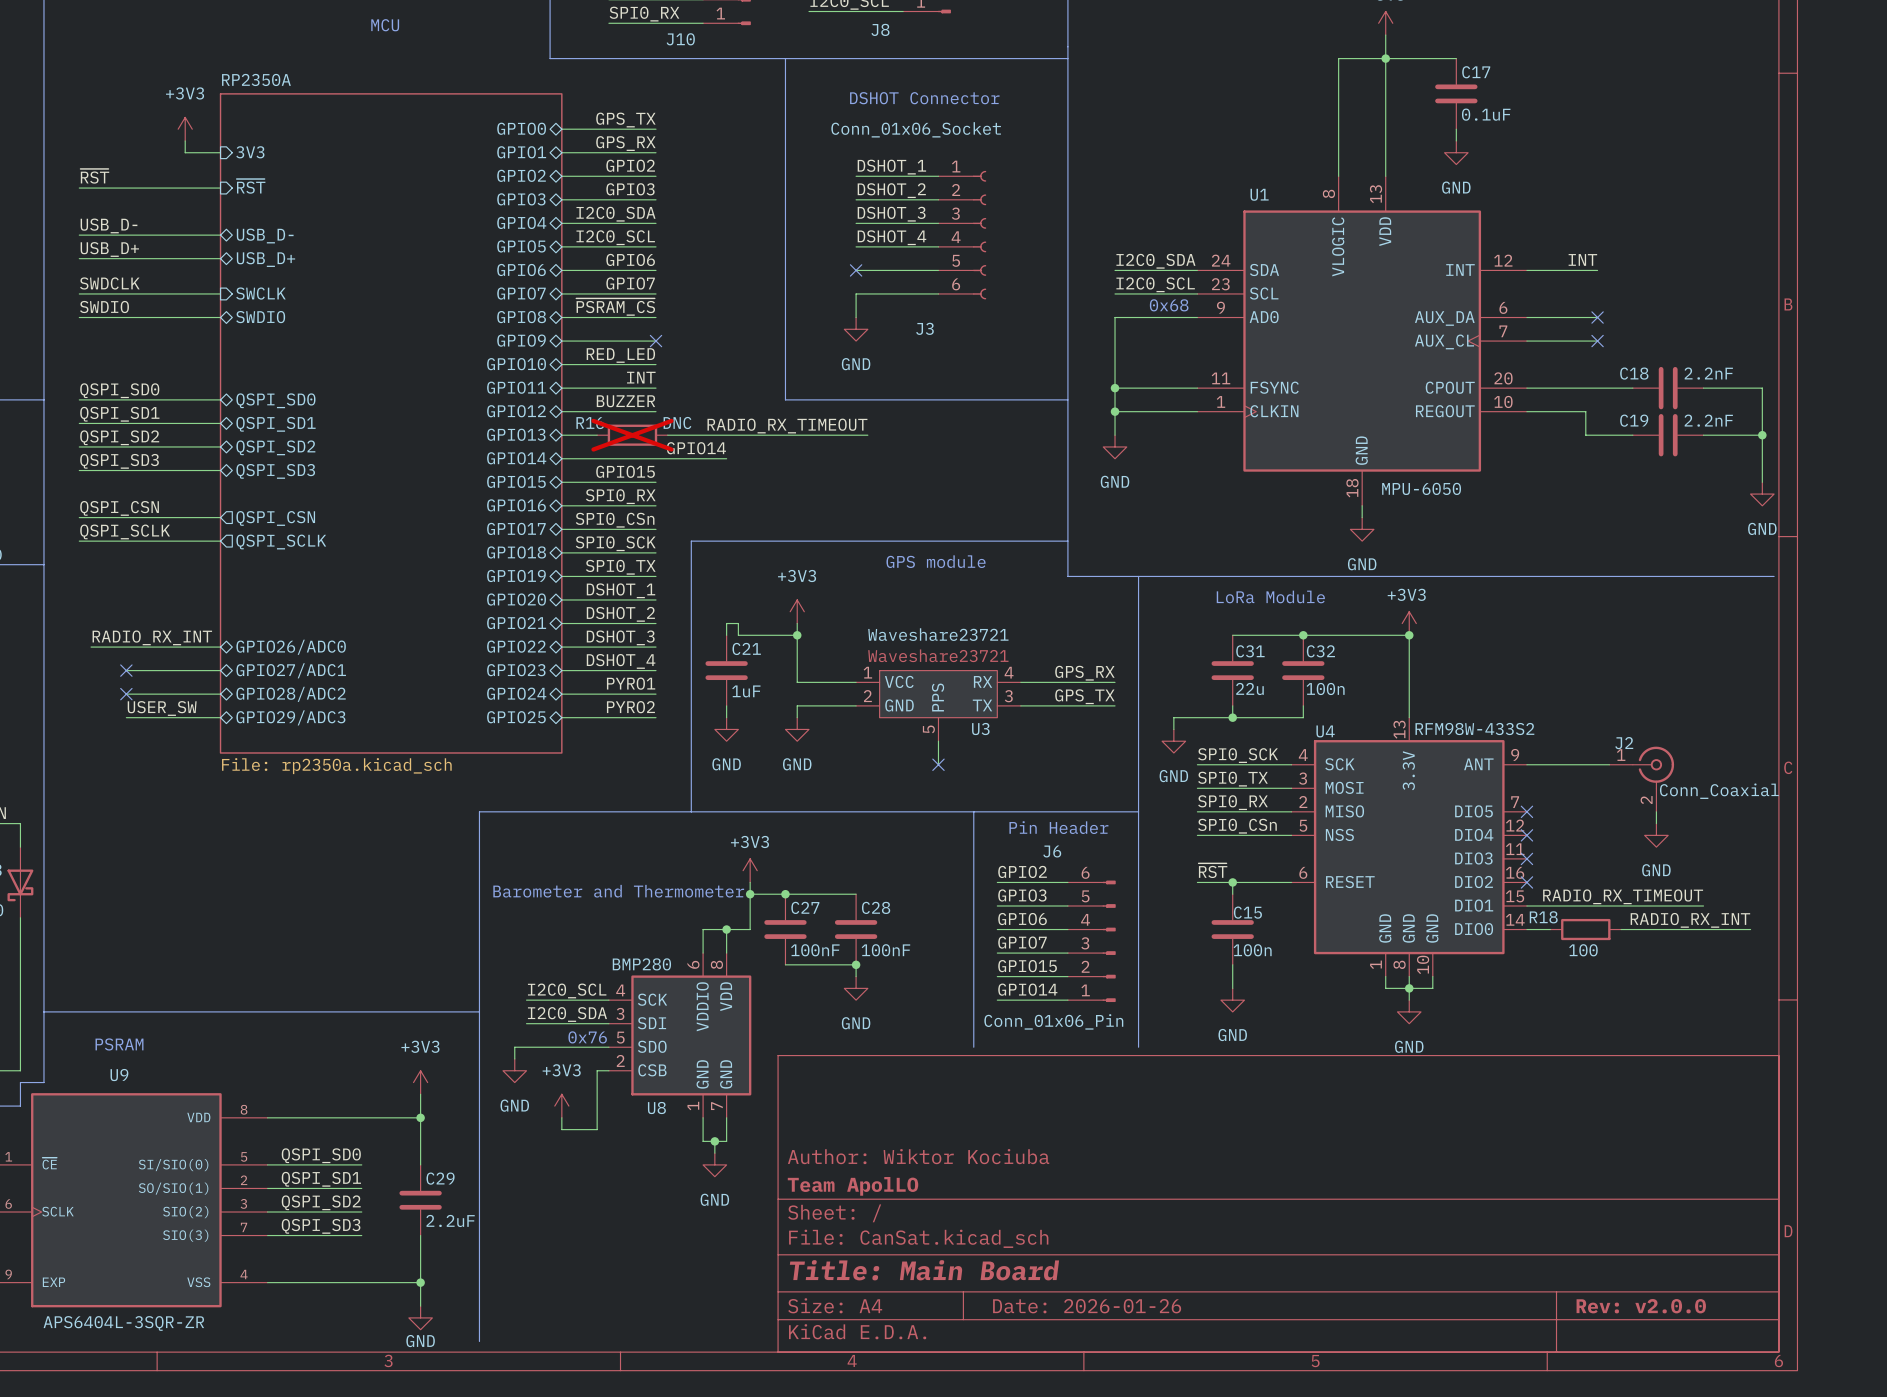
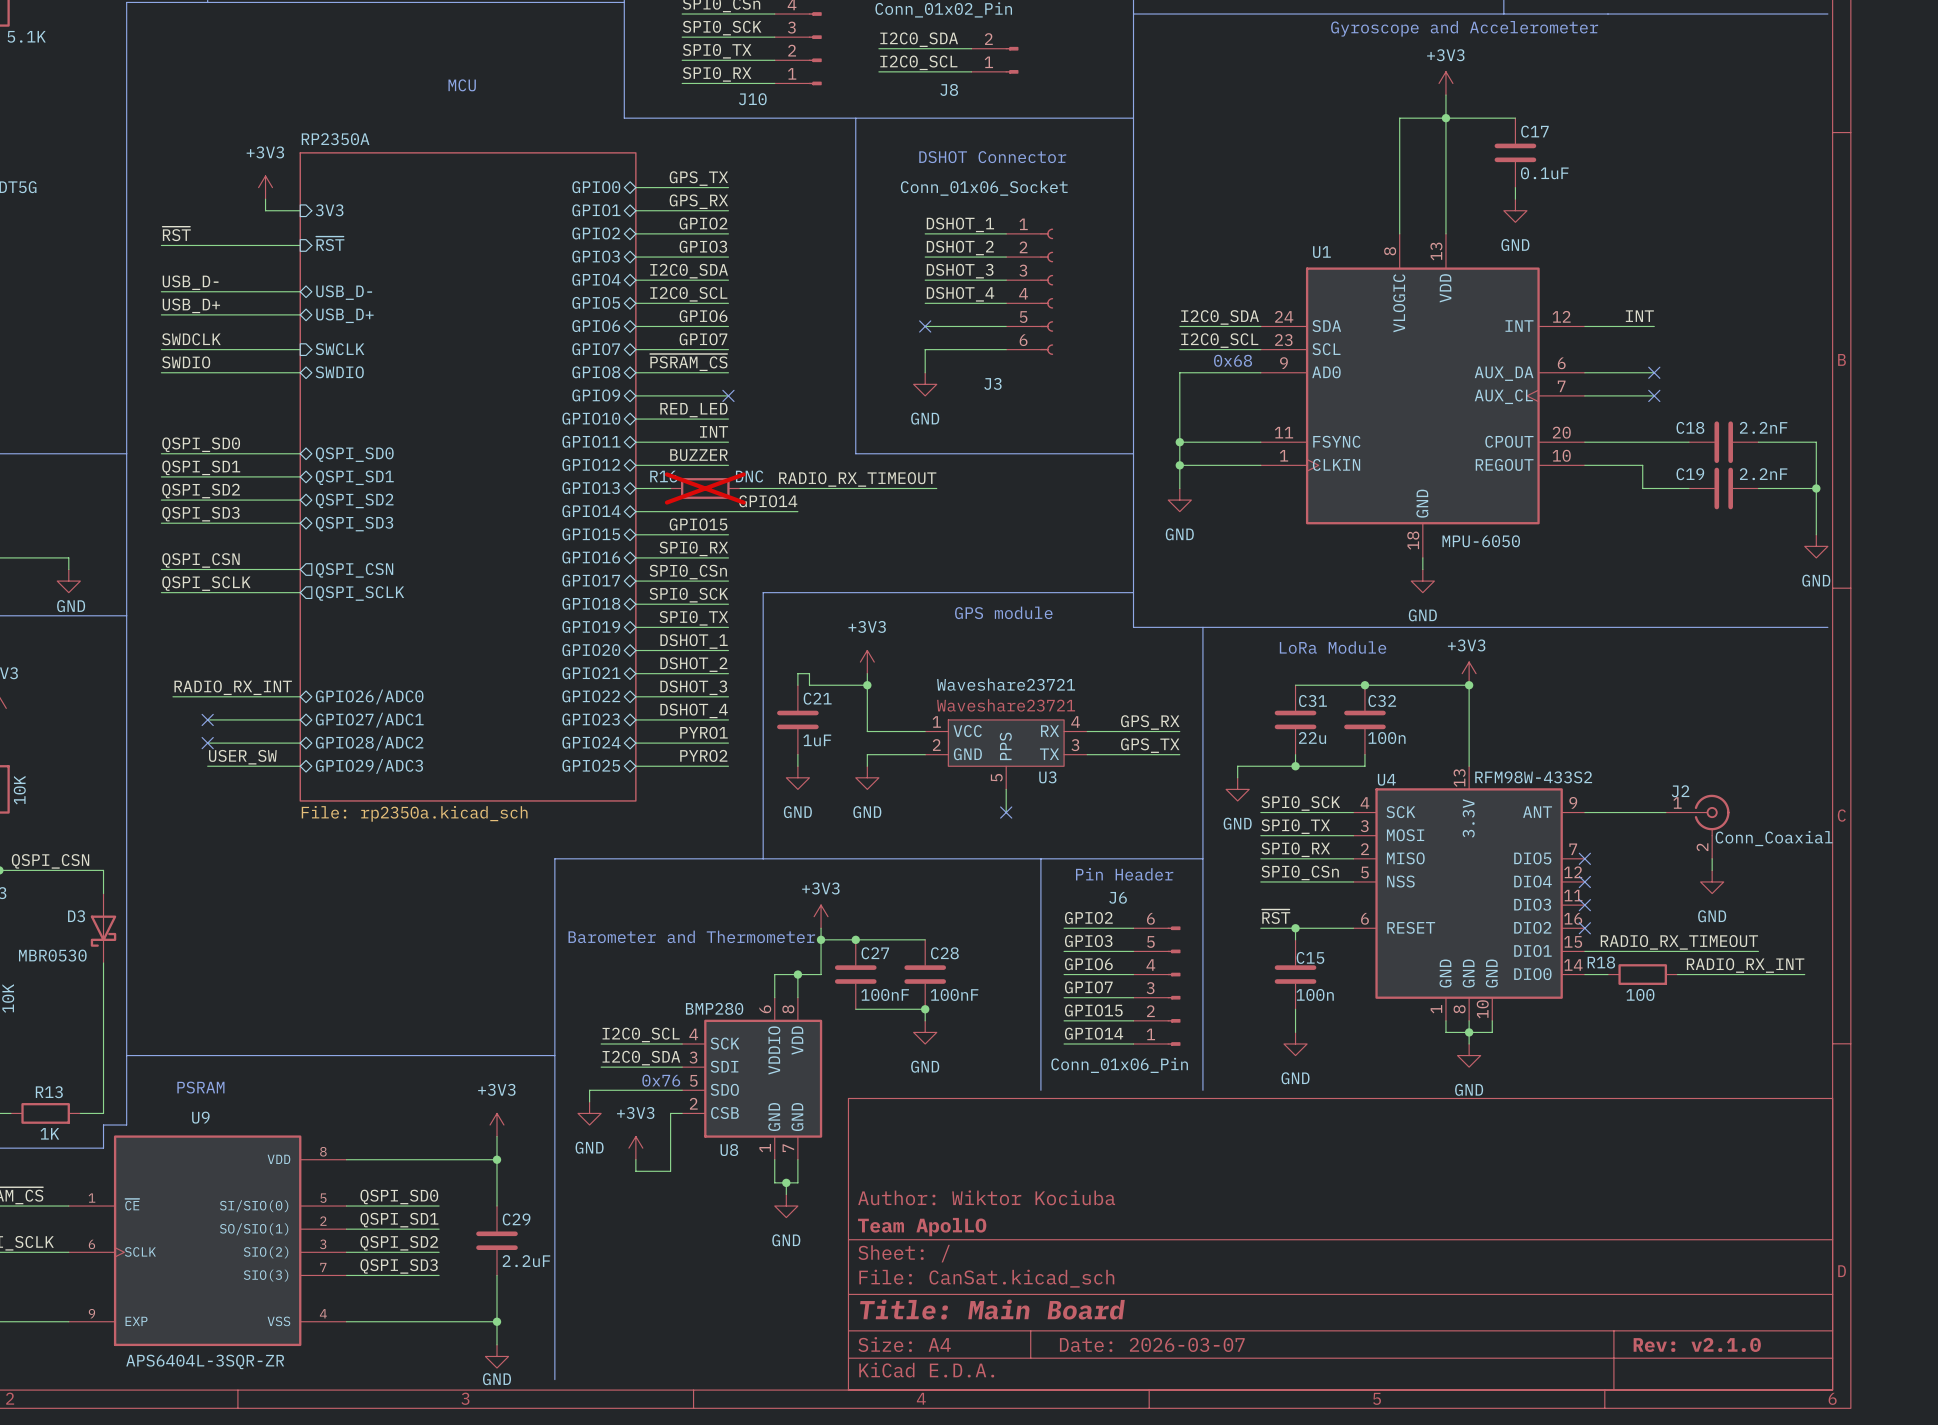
title block: Date: 2026-01-26 (1087, 1306) -> Date: 2026-03-07 (1152, 1344)
title block: Rev: v2.0.0 (1641, 1306) -> Rev: v2.1.0 (1697, 1344)

